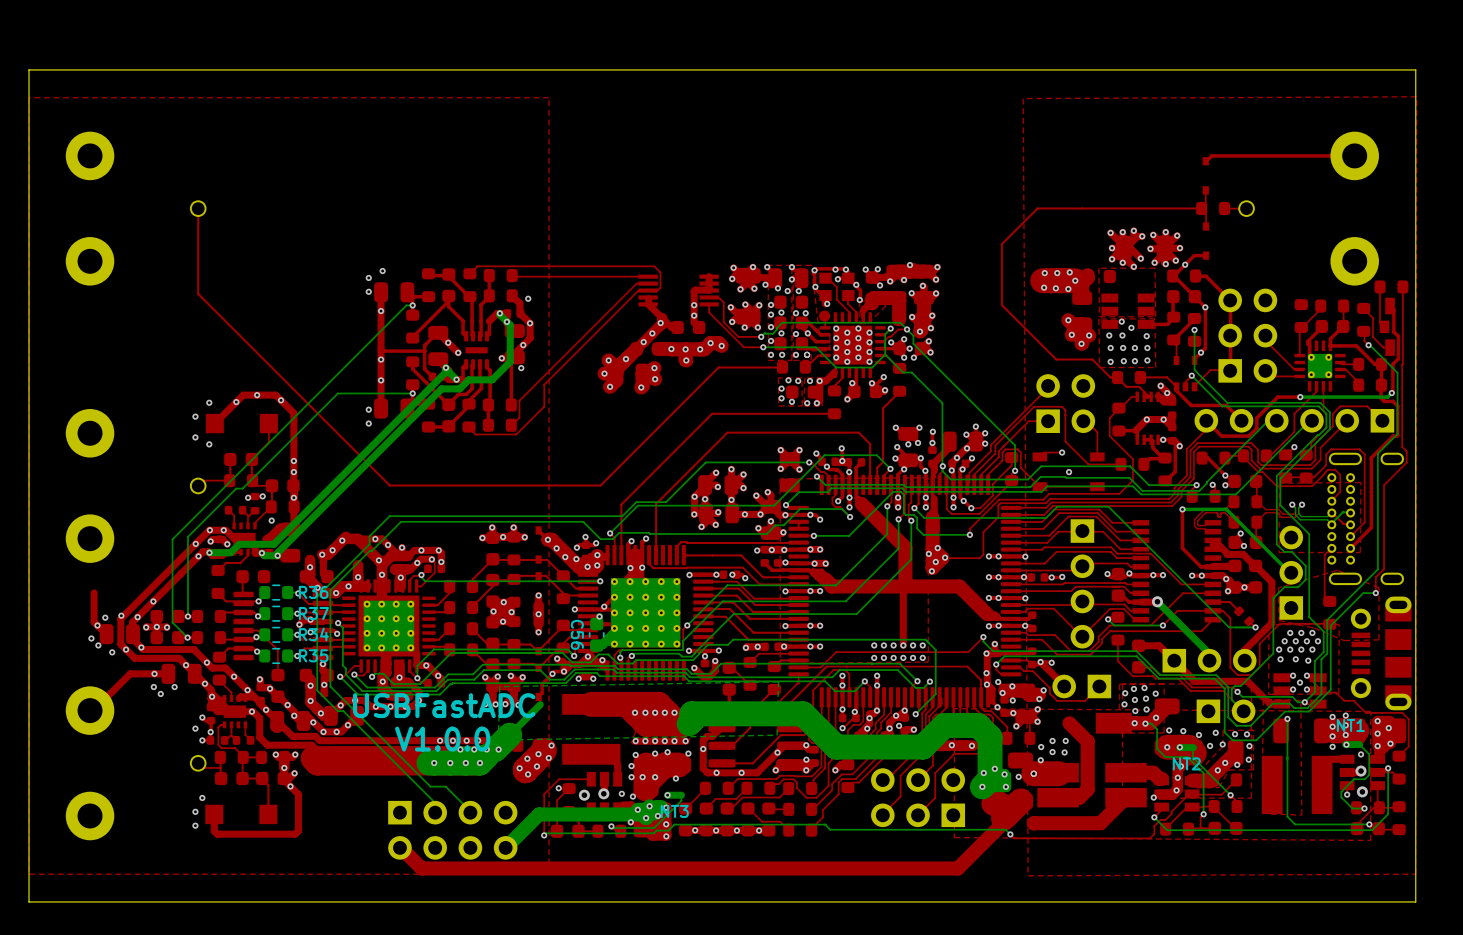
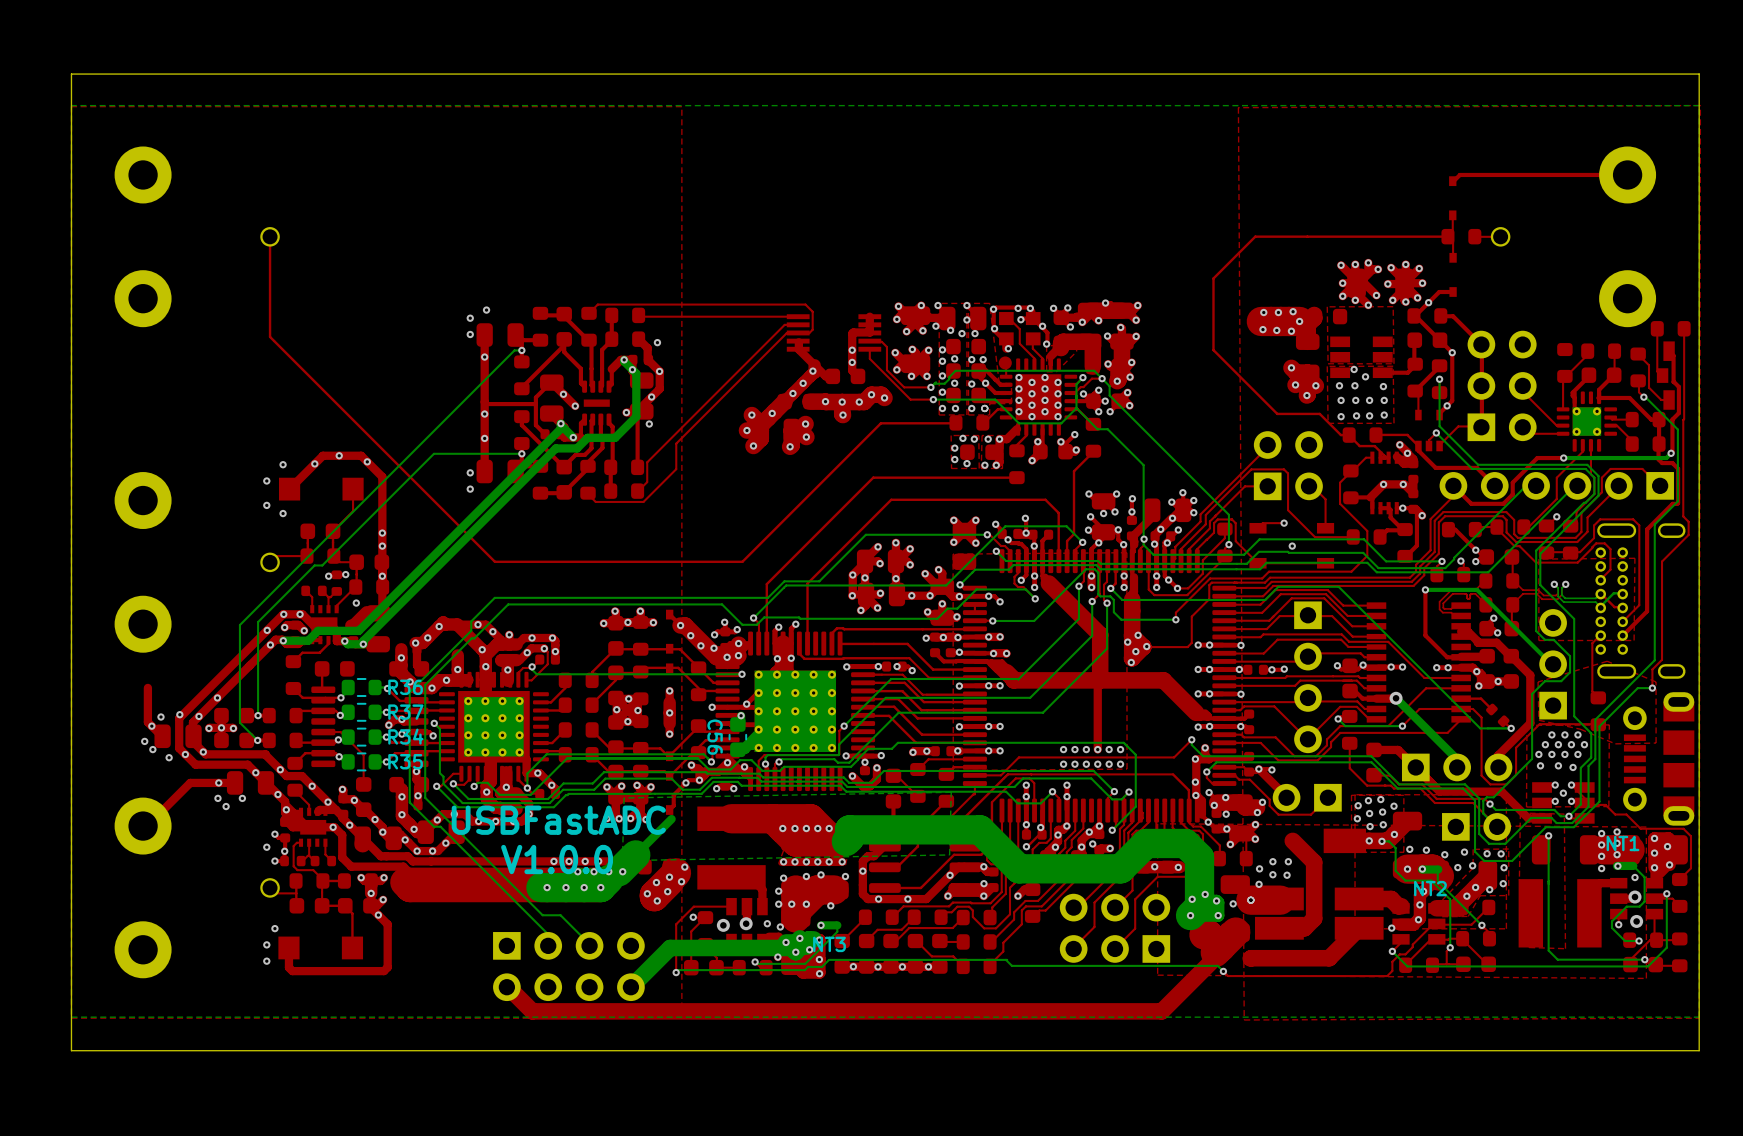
bottom zone outline: none -> (1699, 105) (1699, 1017) (71, 1017) (71, 105) (1699, 105)

